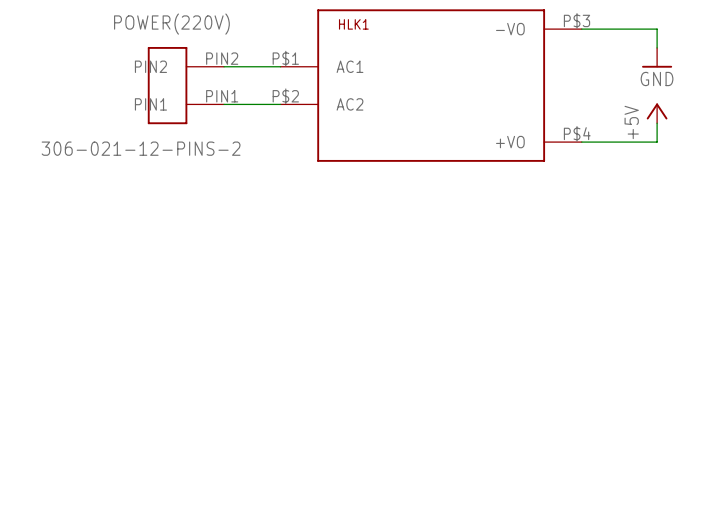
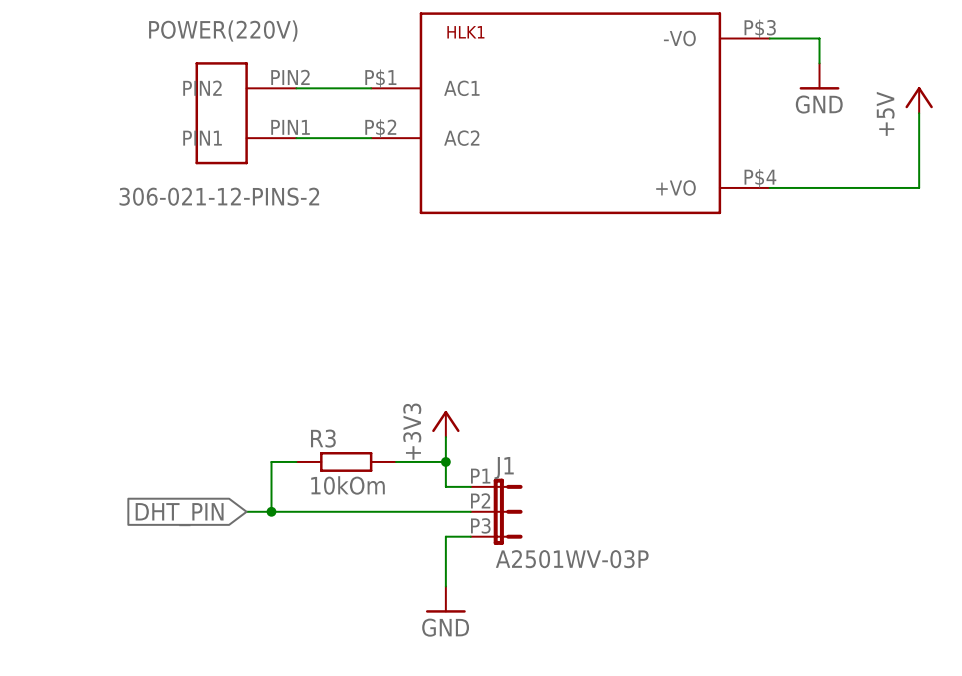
wire: (619, 29) (657, 29) (657, 47) -> (819, 38) (819, 63)
power symbol position: GND (657, 57) -> GND (819, 76)
power symbol position: +5V (657, 113) -> +5V (919, 100)
wire: (657, 123) (657, 142) -> (919, 113) (919, 187) (869, 187)
power symbol: none -> +3V3 (445, 423)
wire: none -> (445, 437) (445, 486) (470, 486)
wire: none -> (296, 461) (271, 461) (271, 511)
R3: none -> 10kOm (346, 461)
wire: none -> (396, 461) (445, 461)
junction: none -> (445, 461)
wire: none -> (246, 511) (470, 511)
junction: none -> (271, 511)
J1: none -> A2501WV-03P (496, 511)
global label: none -> DHT_PIN (179, 514)
wire: none -> (470, 536) (445, 536) (445, 586)
power symbol: none -> GND (445, 599)

